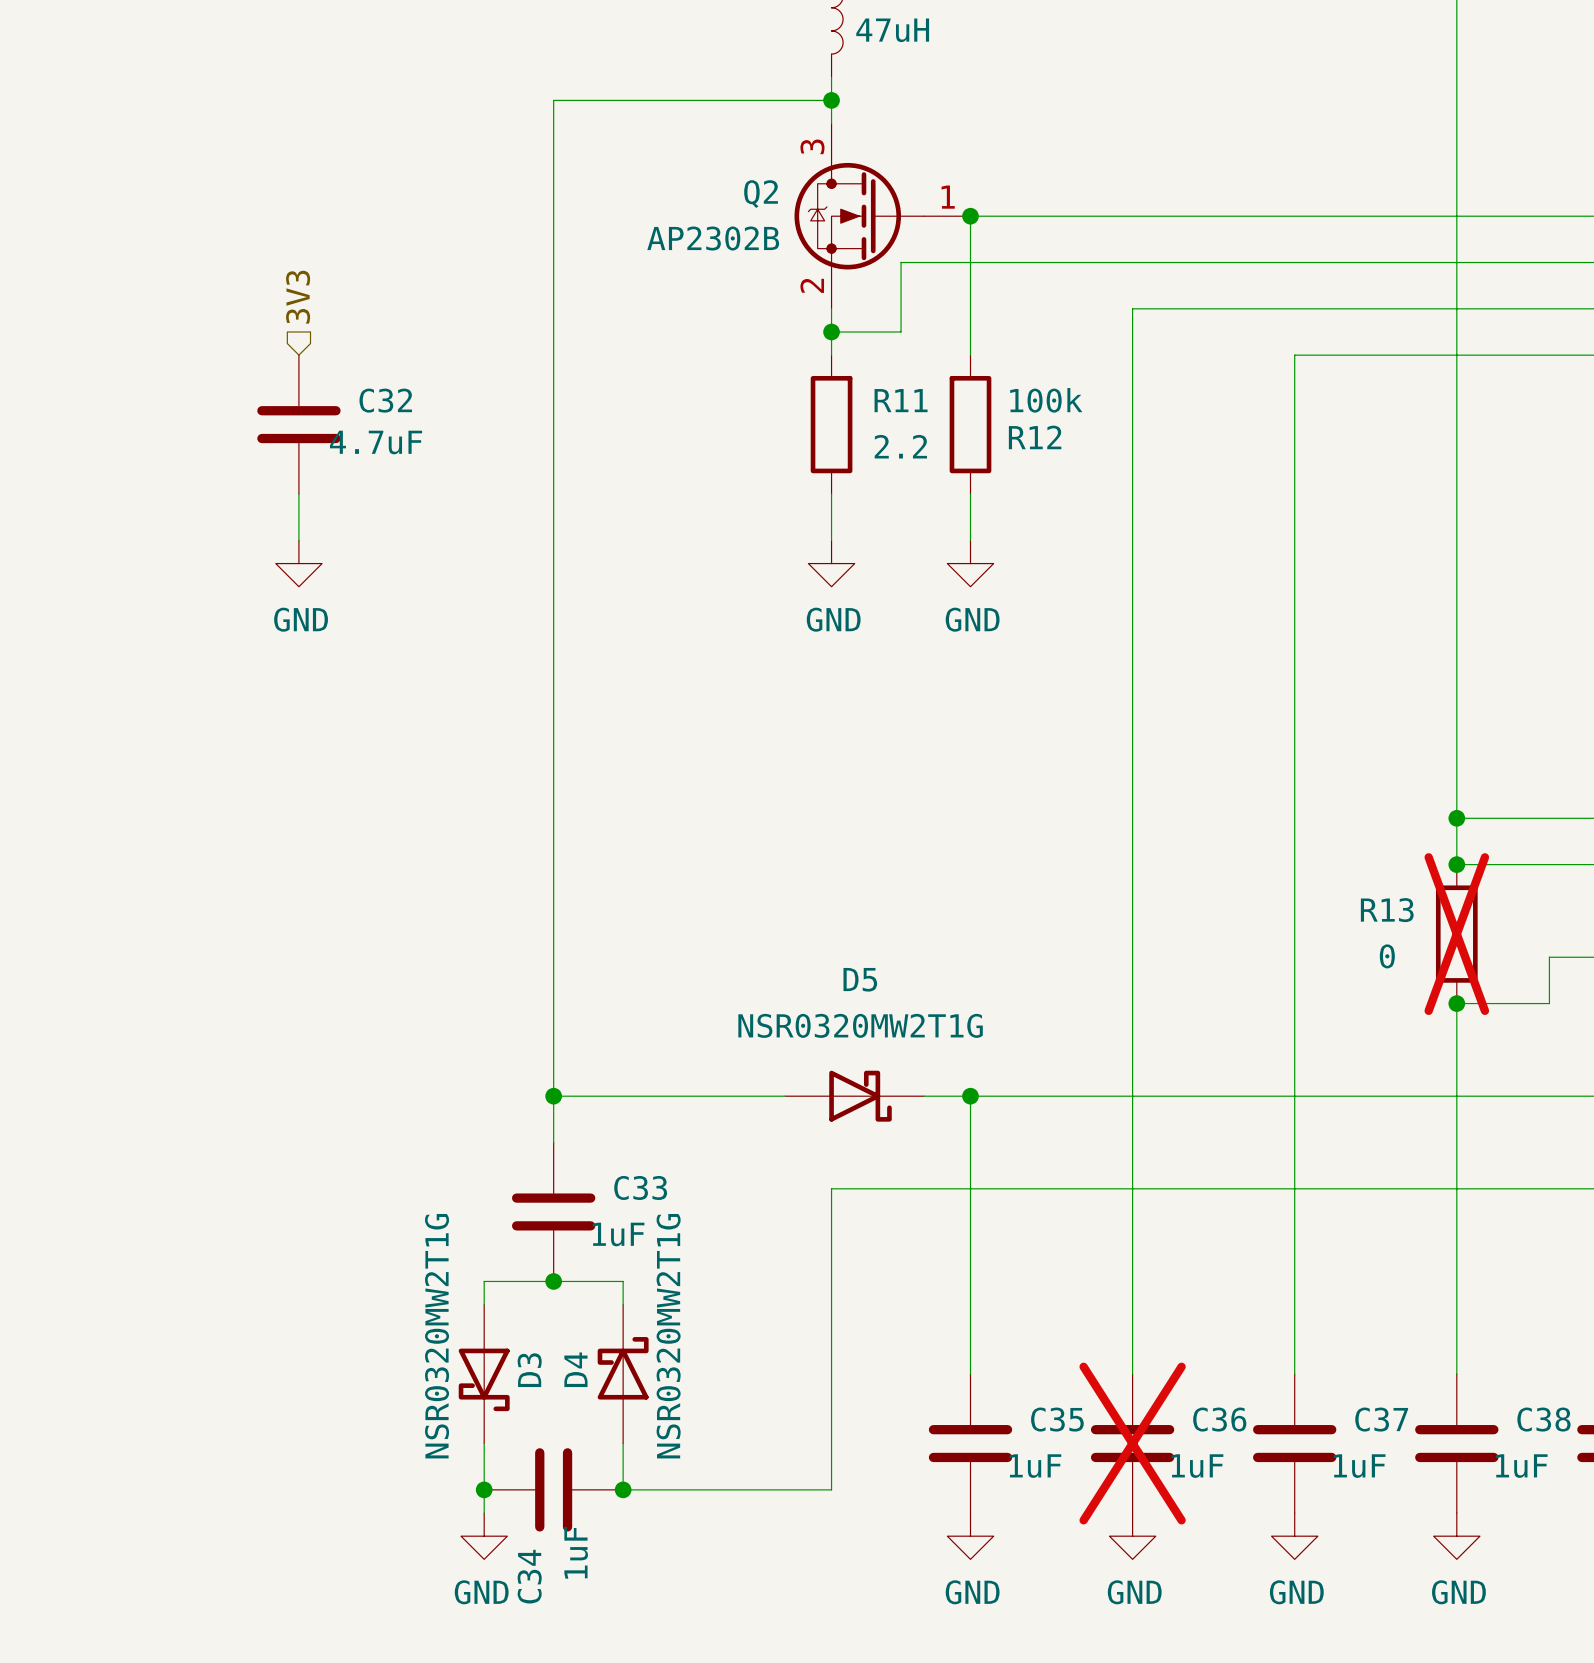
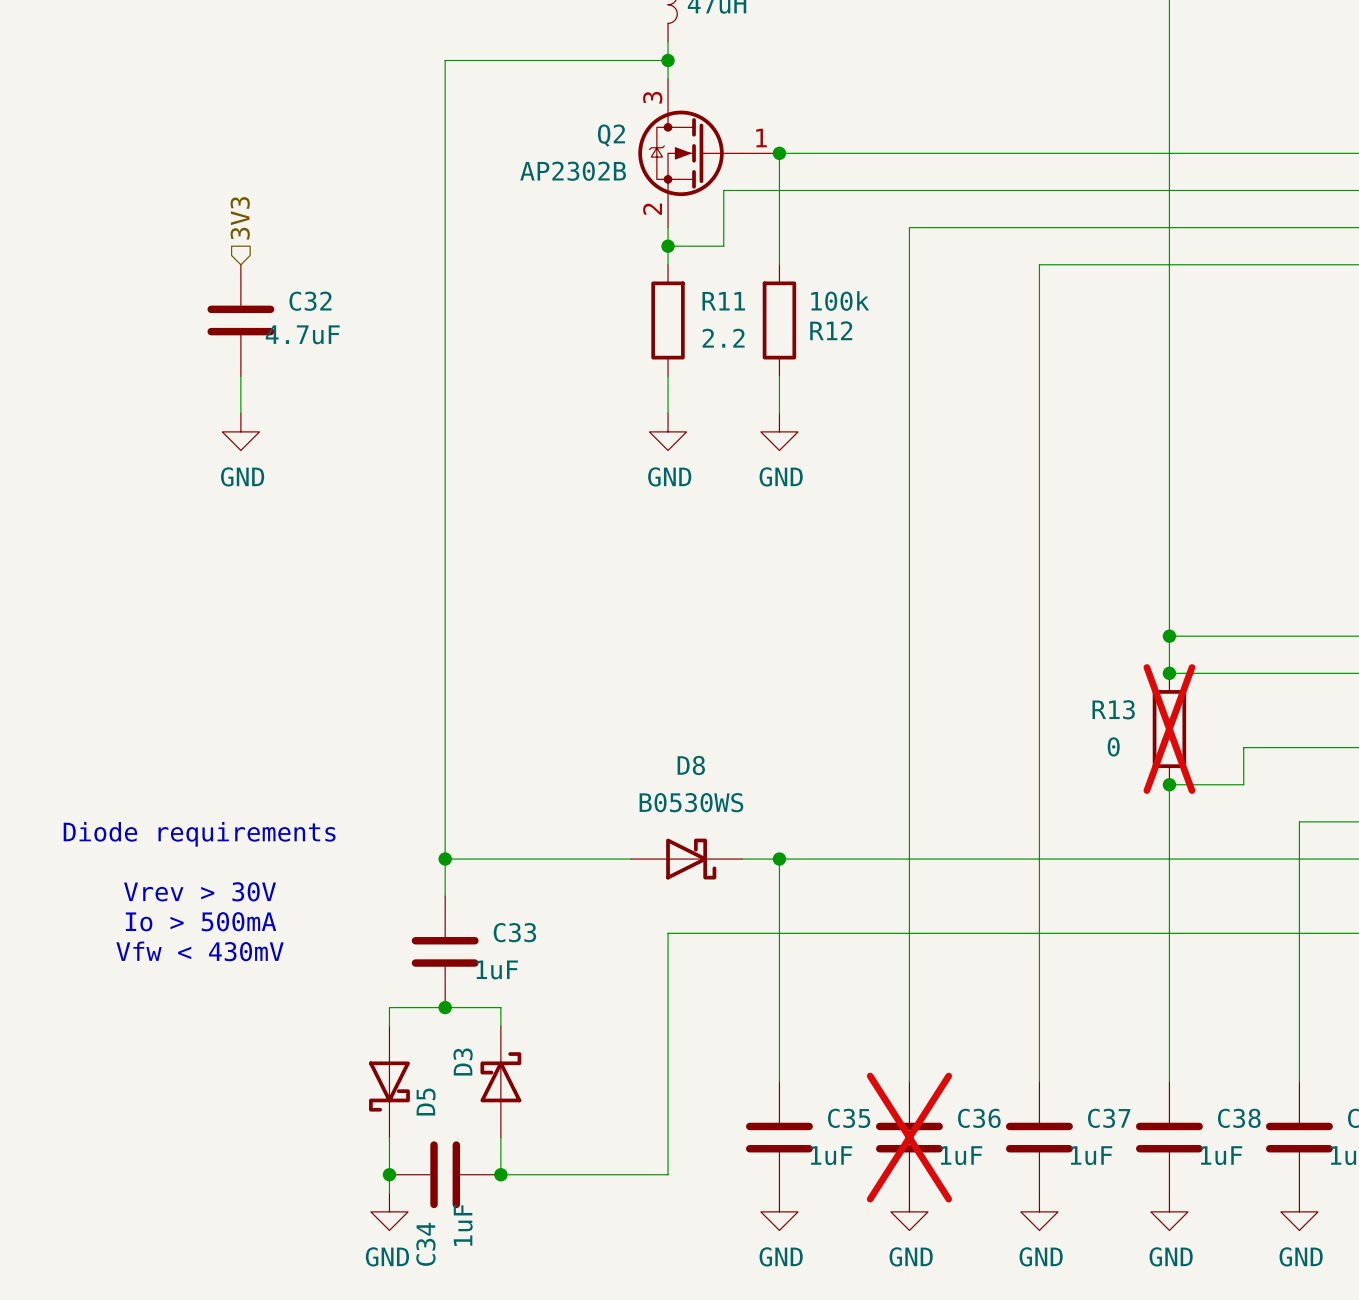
D5 name: D5 (860, 979) -> D8 (691, 765)
D5 value: NSR0320MW2T1G (860, 1025) -> B0530WS (691, 802)
text: none -> Diode requirements (199, 834)
text: none -> Vrev > 30V (200, 891)
text: none -> Io > 500mA (201, 921)
text: none -> Vfw < 430mV (200, 951)
D4 value: NSR0320MW2T1G (668, 1336) -> none
D4 name: D4 (575, 1369) -> D3 (463, 1062)
D3: NSR0320MW2T1G (484, 1374) -> none
D5: none -> (389, 1081)

